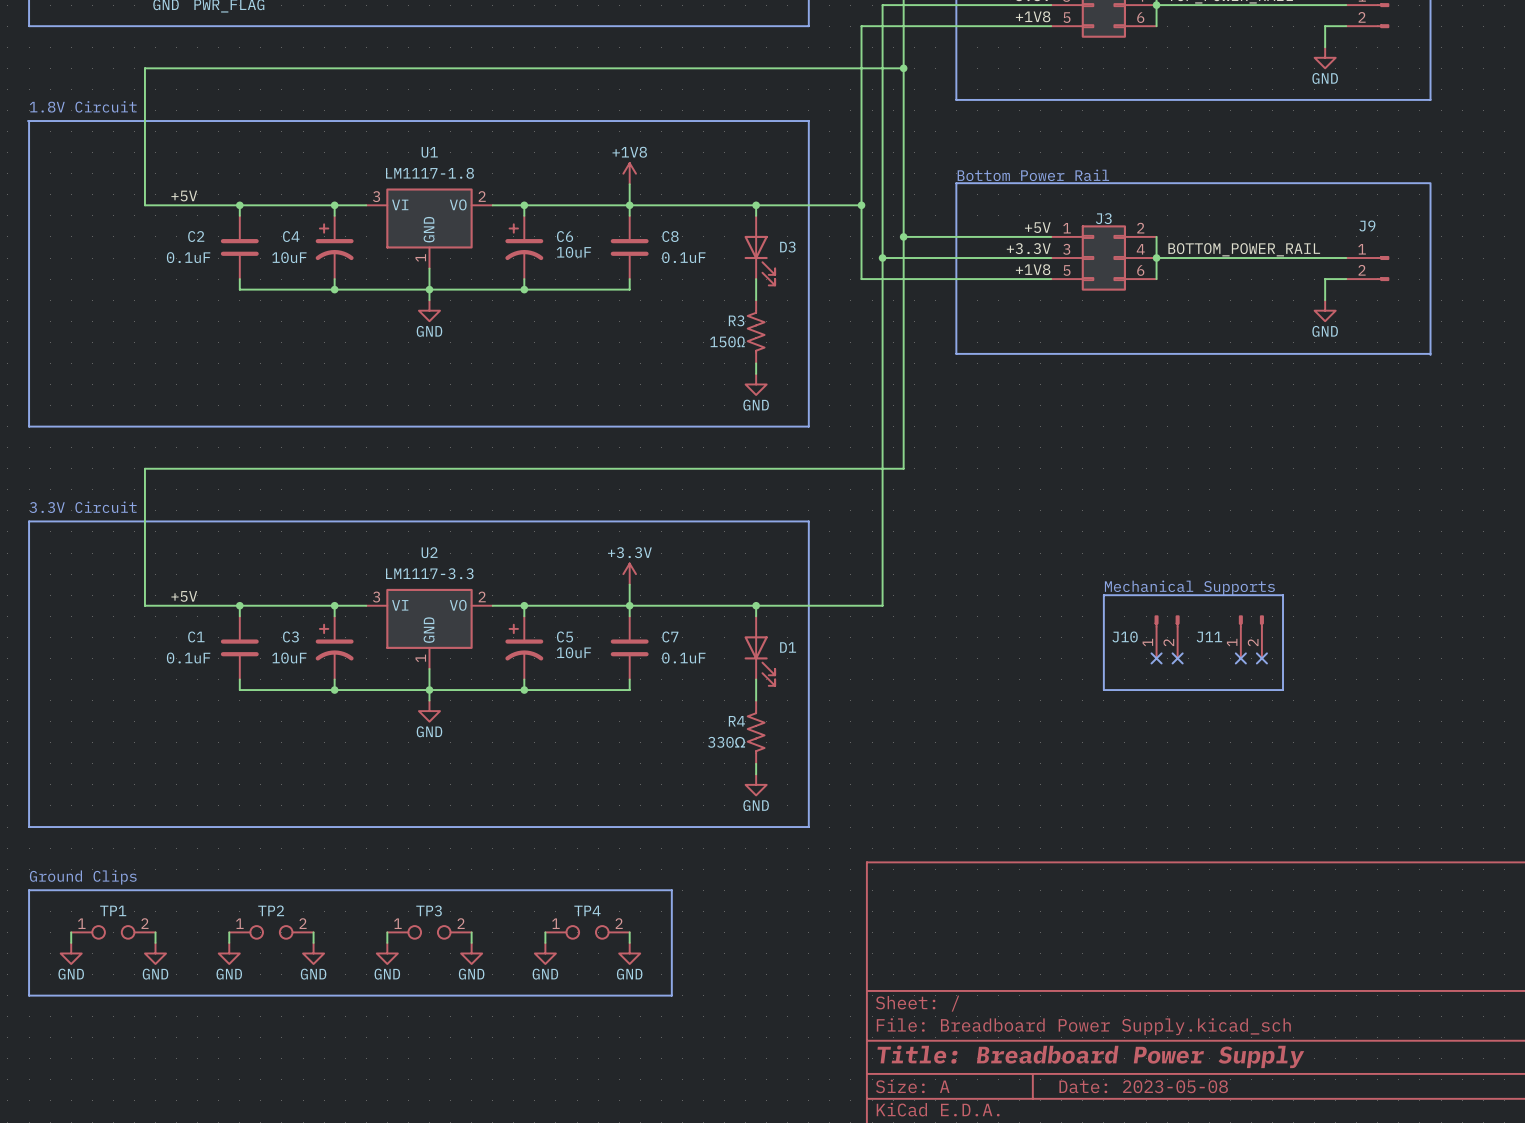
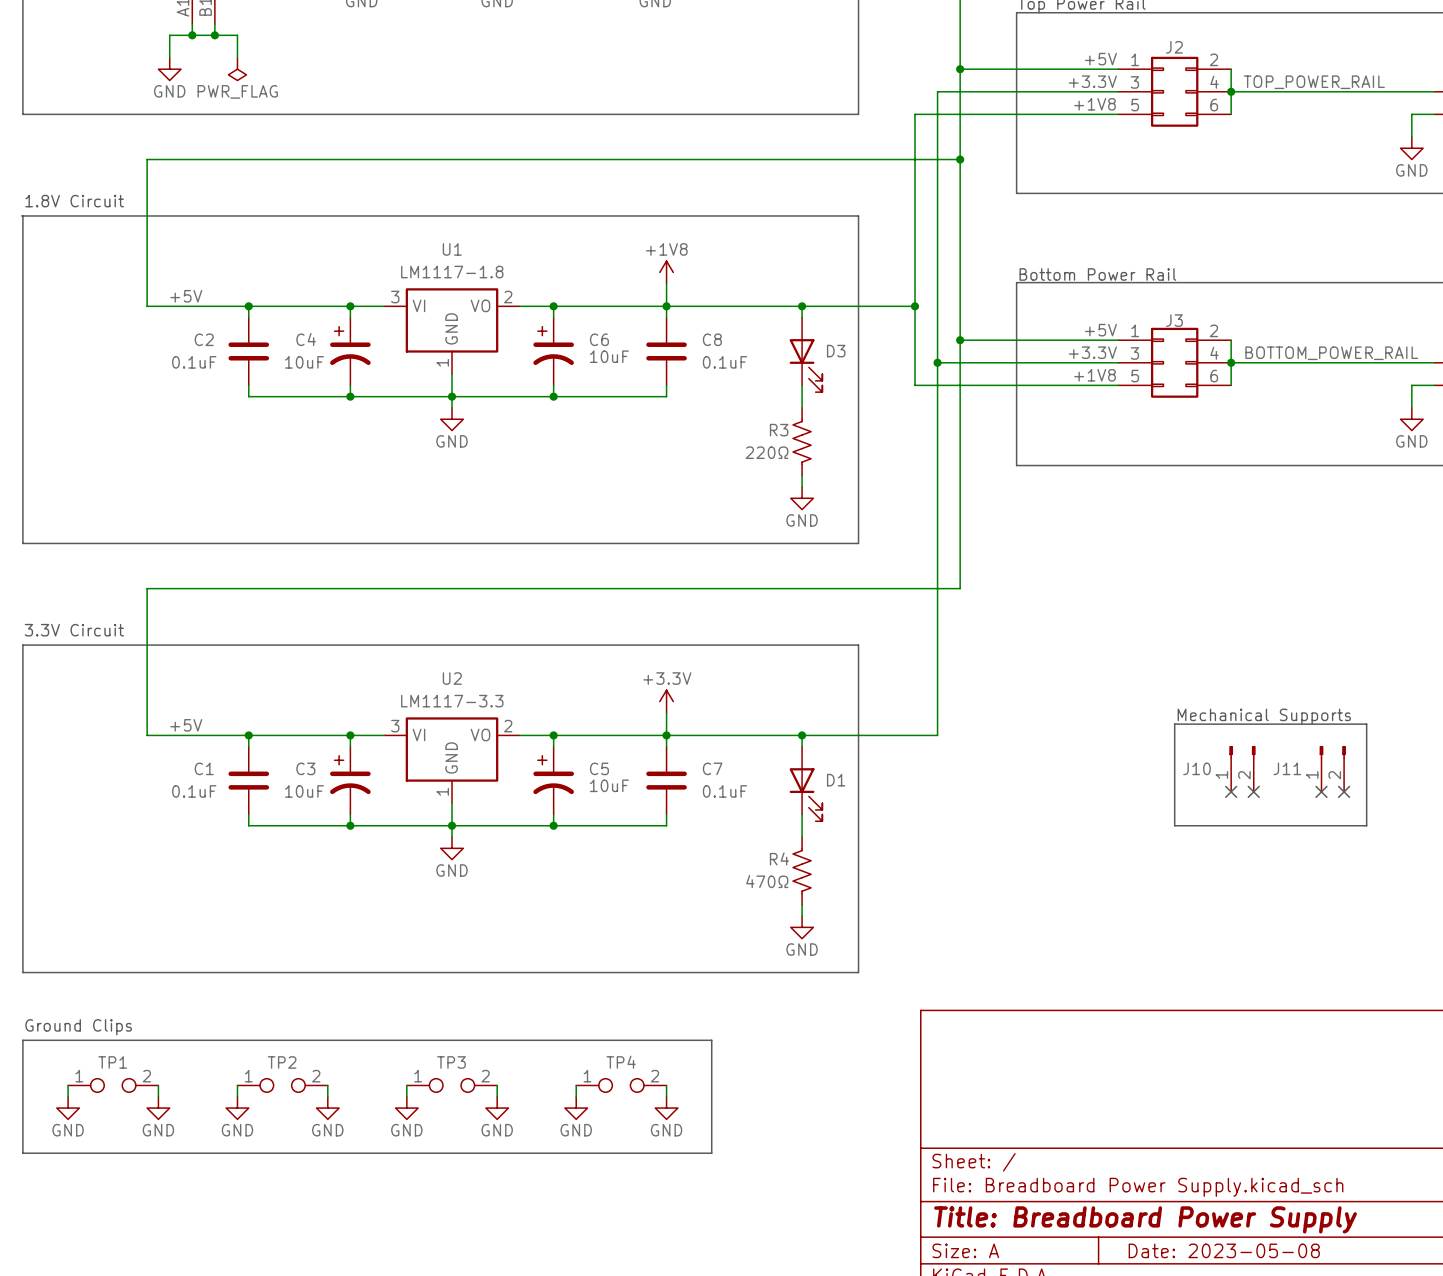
R3 value: 150Ω (727, 341) -> 220Ω (767, 452)
R4 value: 330Ω (726, 742) -> 470Ω (767, 881)

